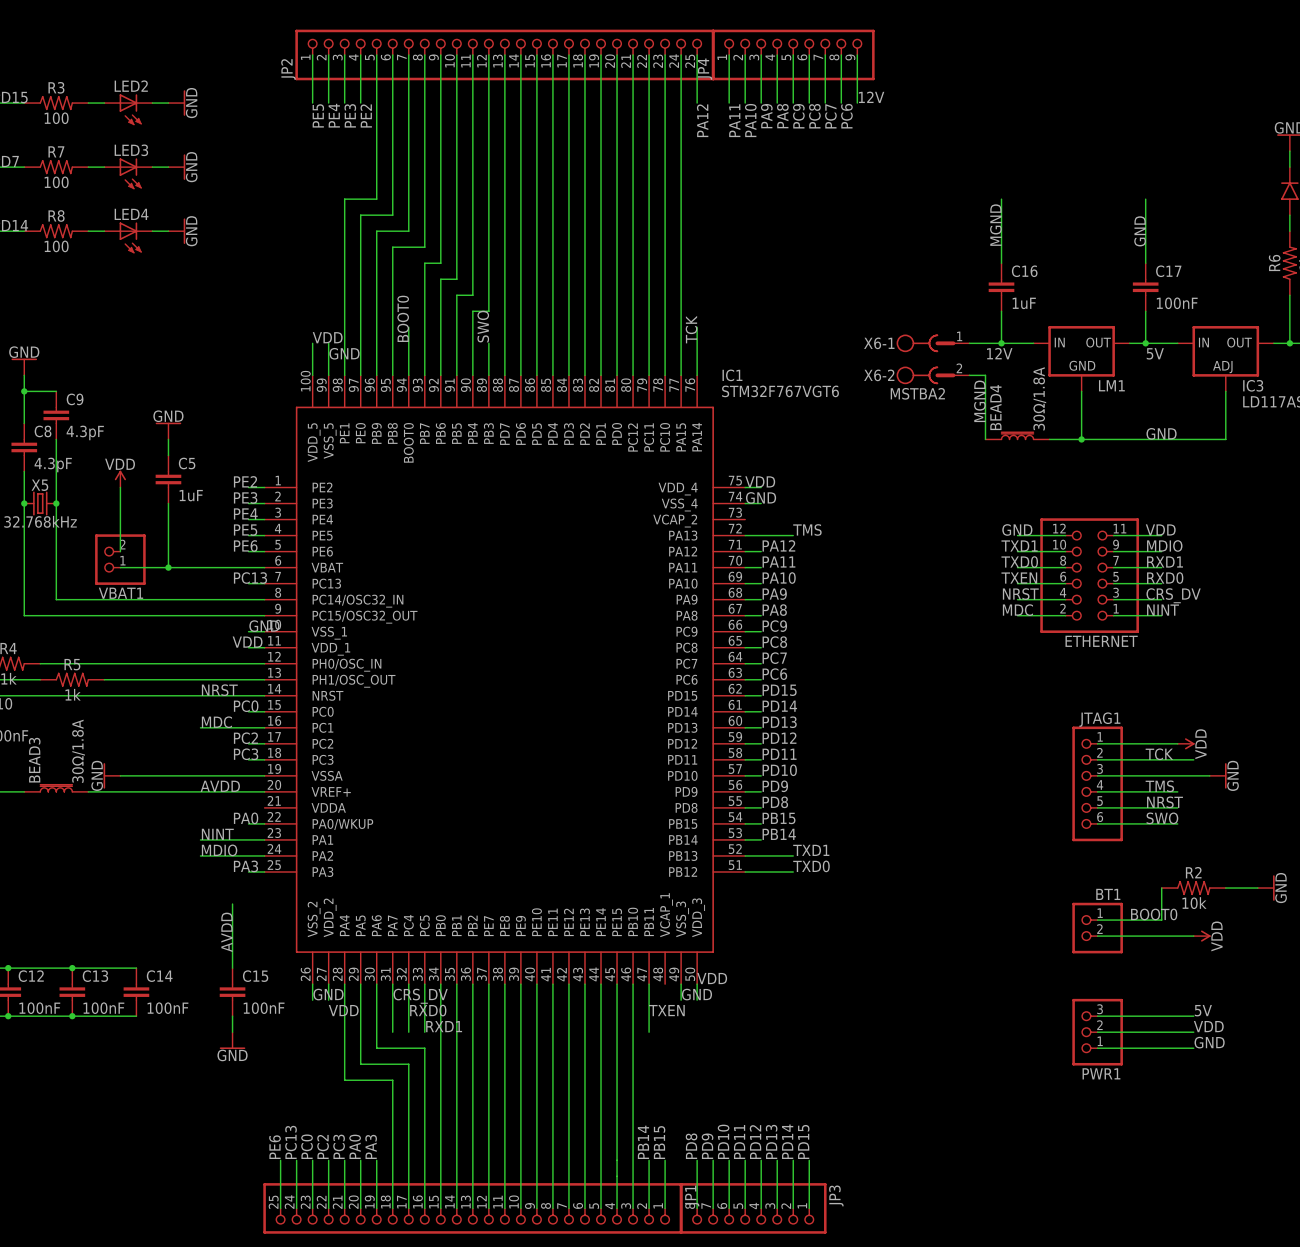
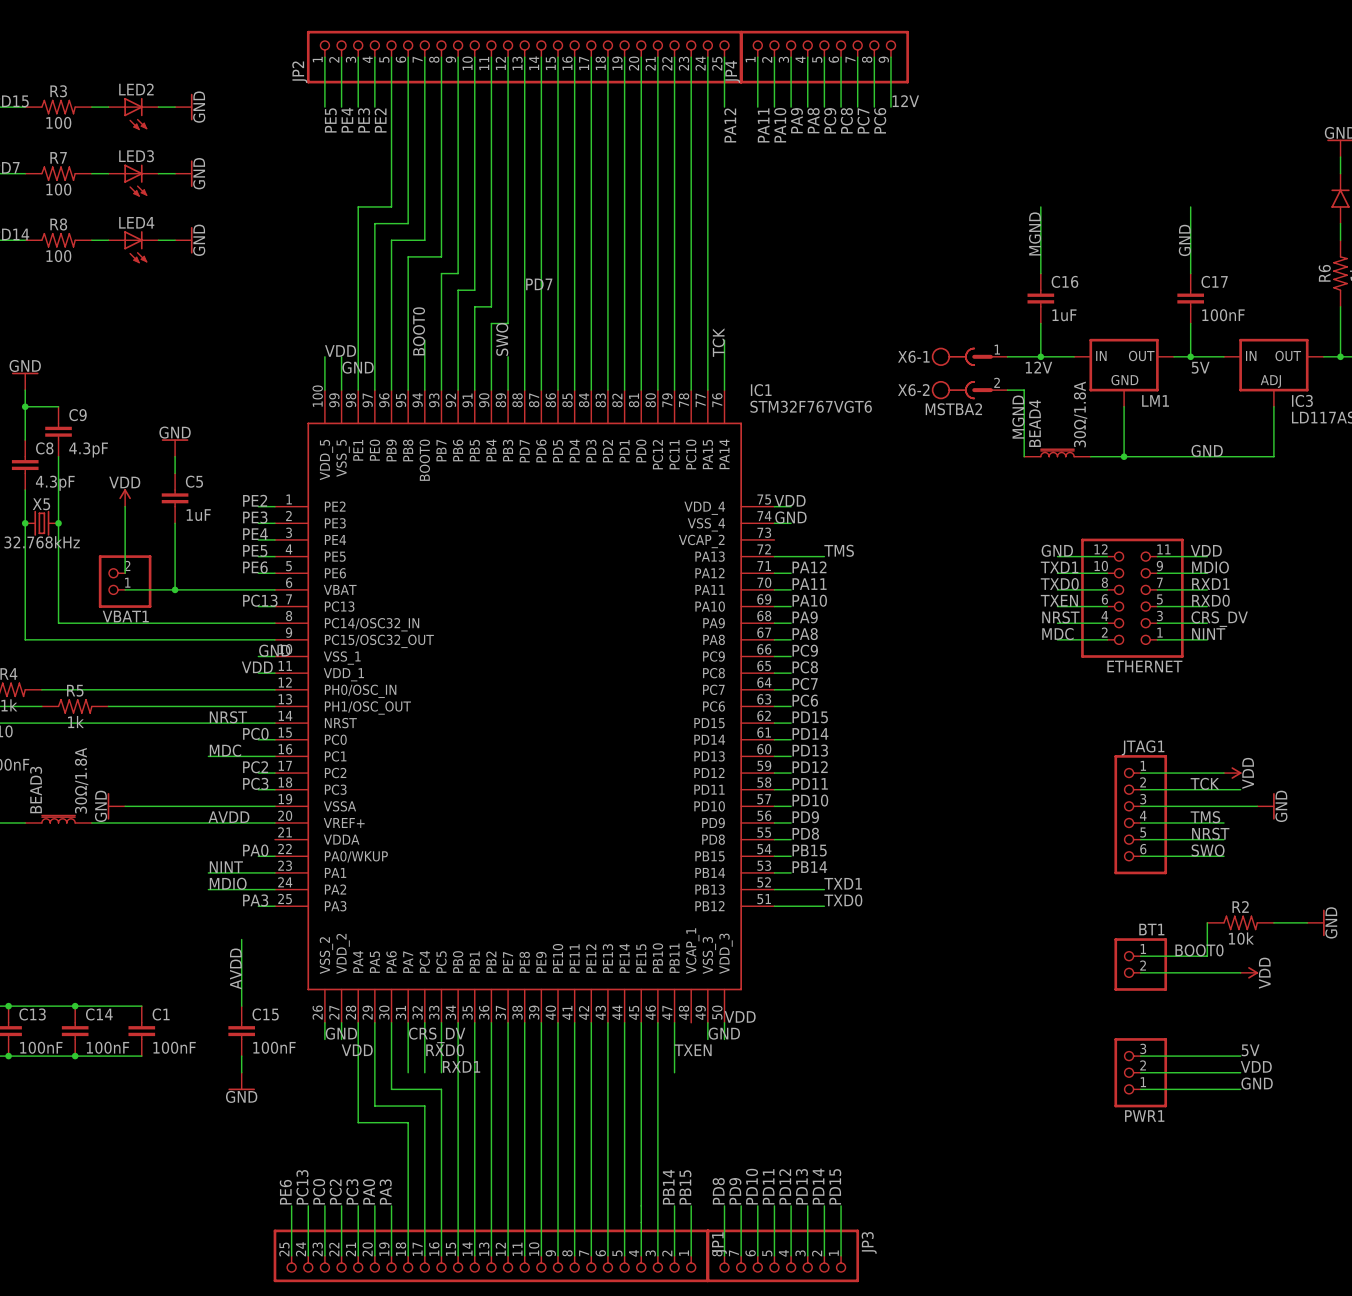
label: none -> PD7 (539, 284)
C12 name: C12 (31, 976) -> C13 (32, 1014)
C13 name: C13 (95, 976) -> C14 (99, 1014)
C14 name: C14 (159, 976) -> C1 (161, 1014)

